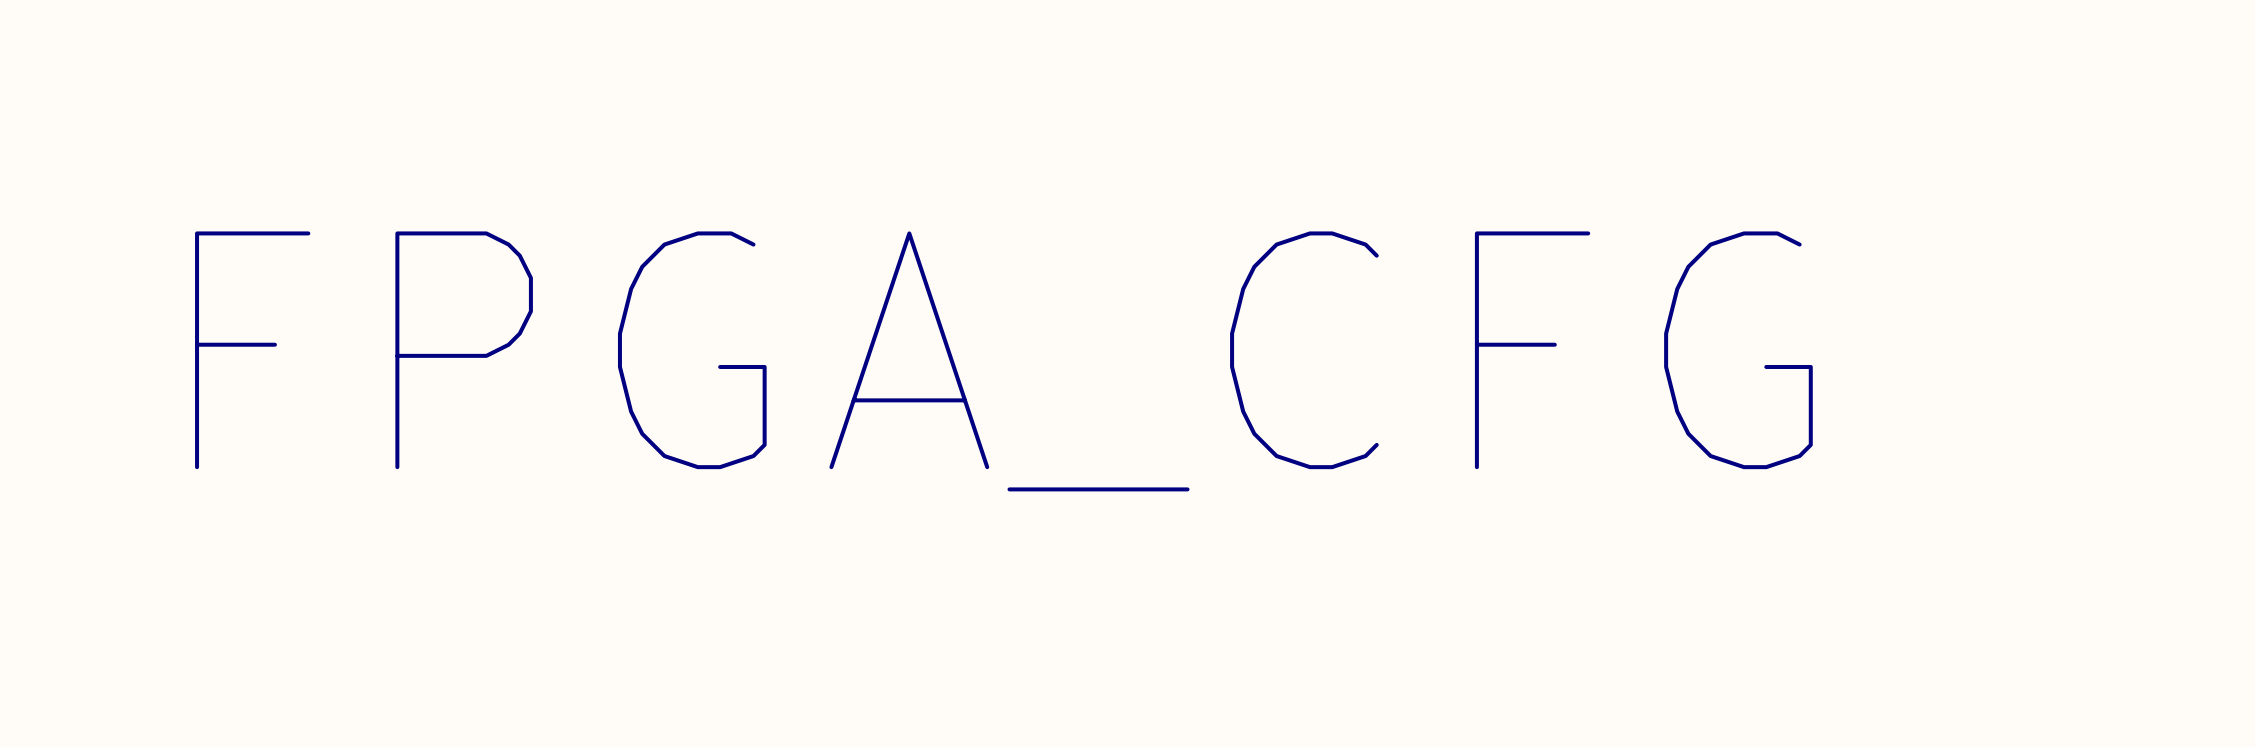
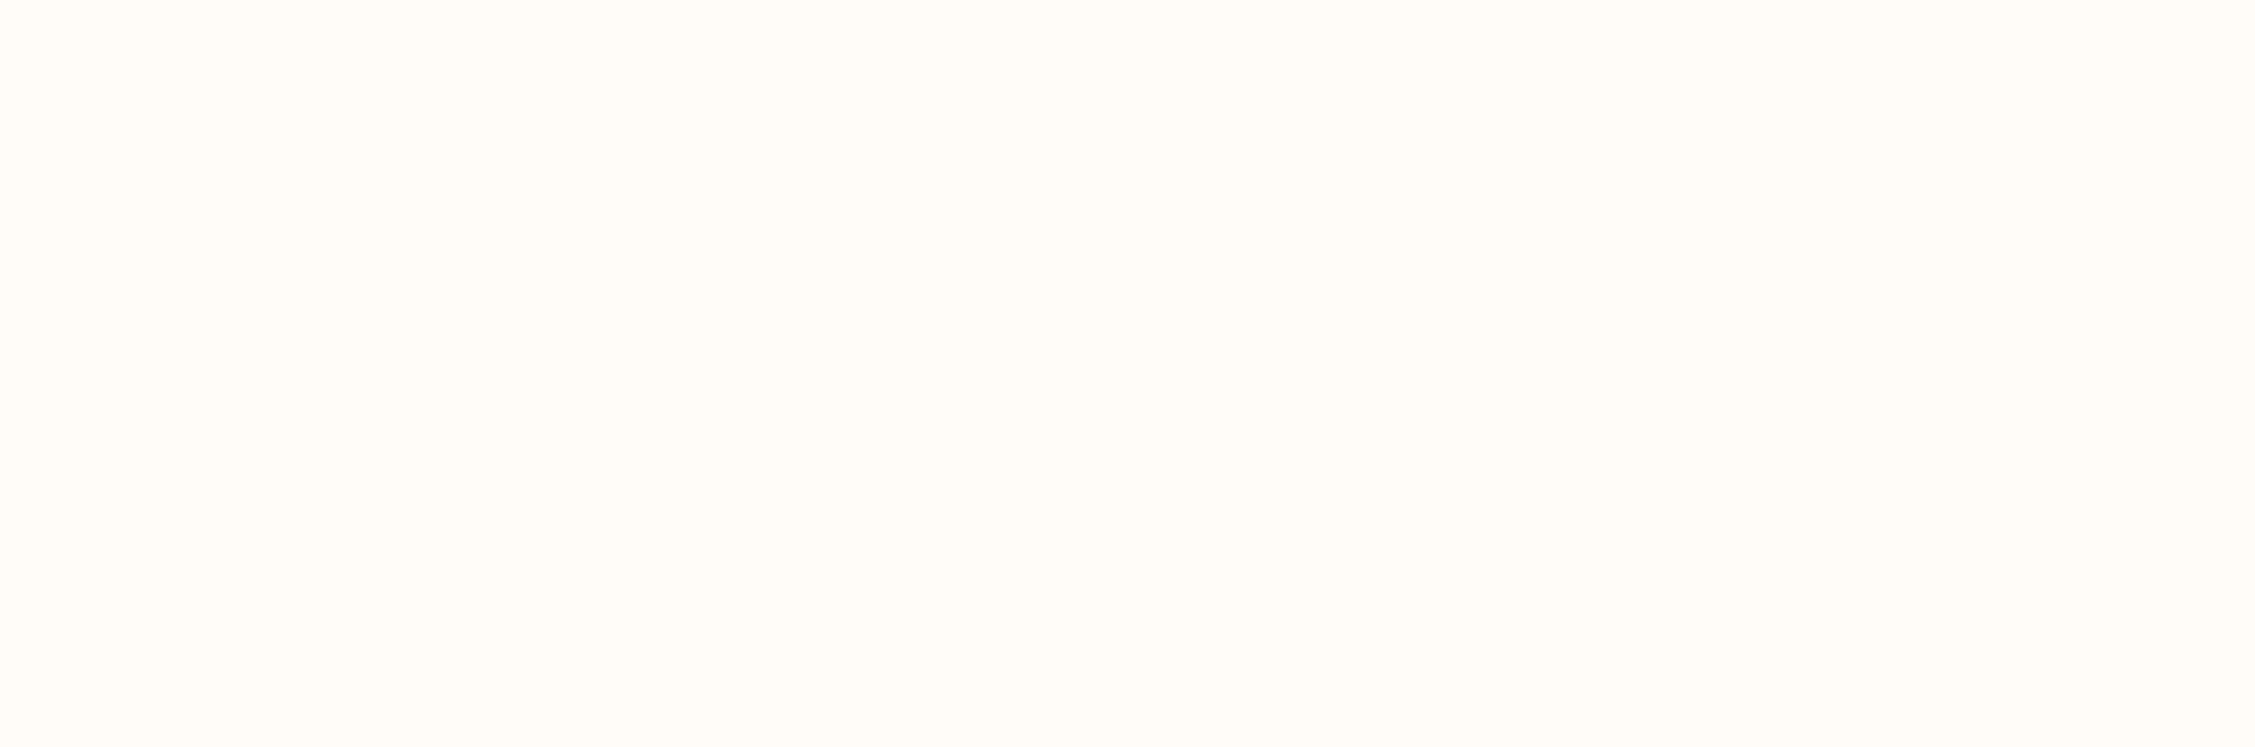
text: FPGA_CFG (1003, 361) -> none

